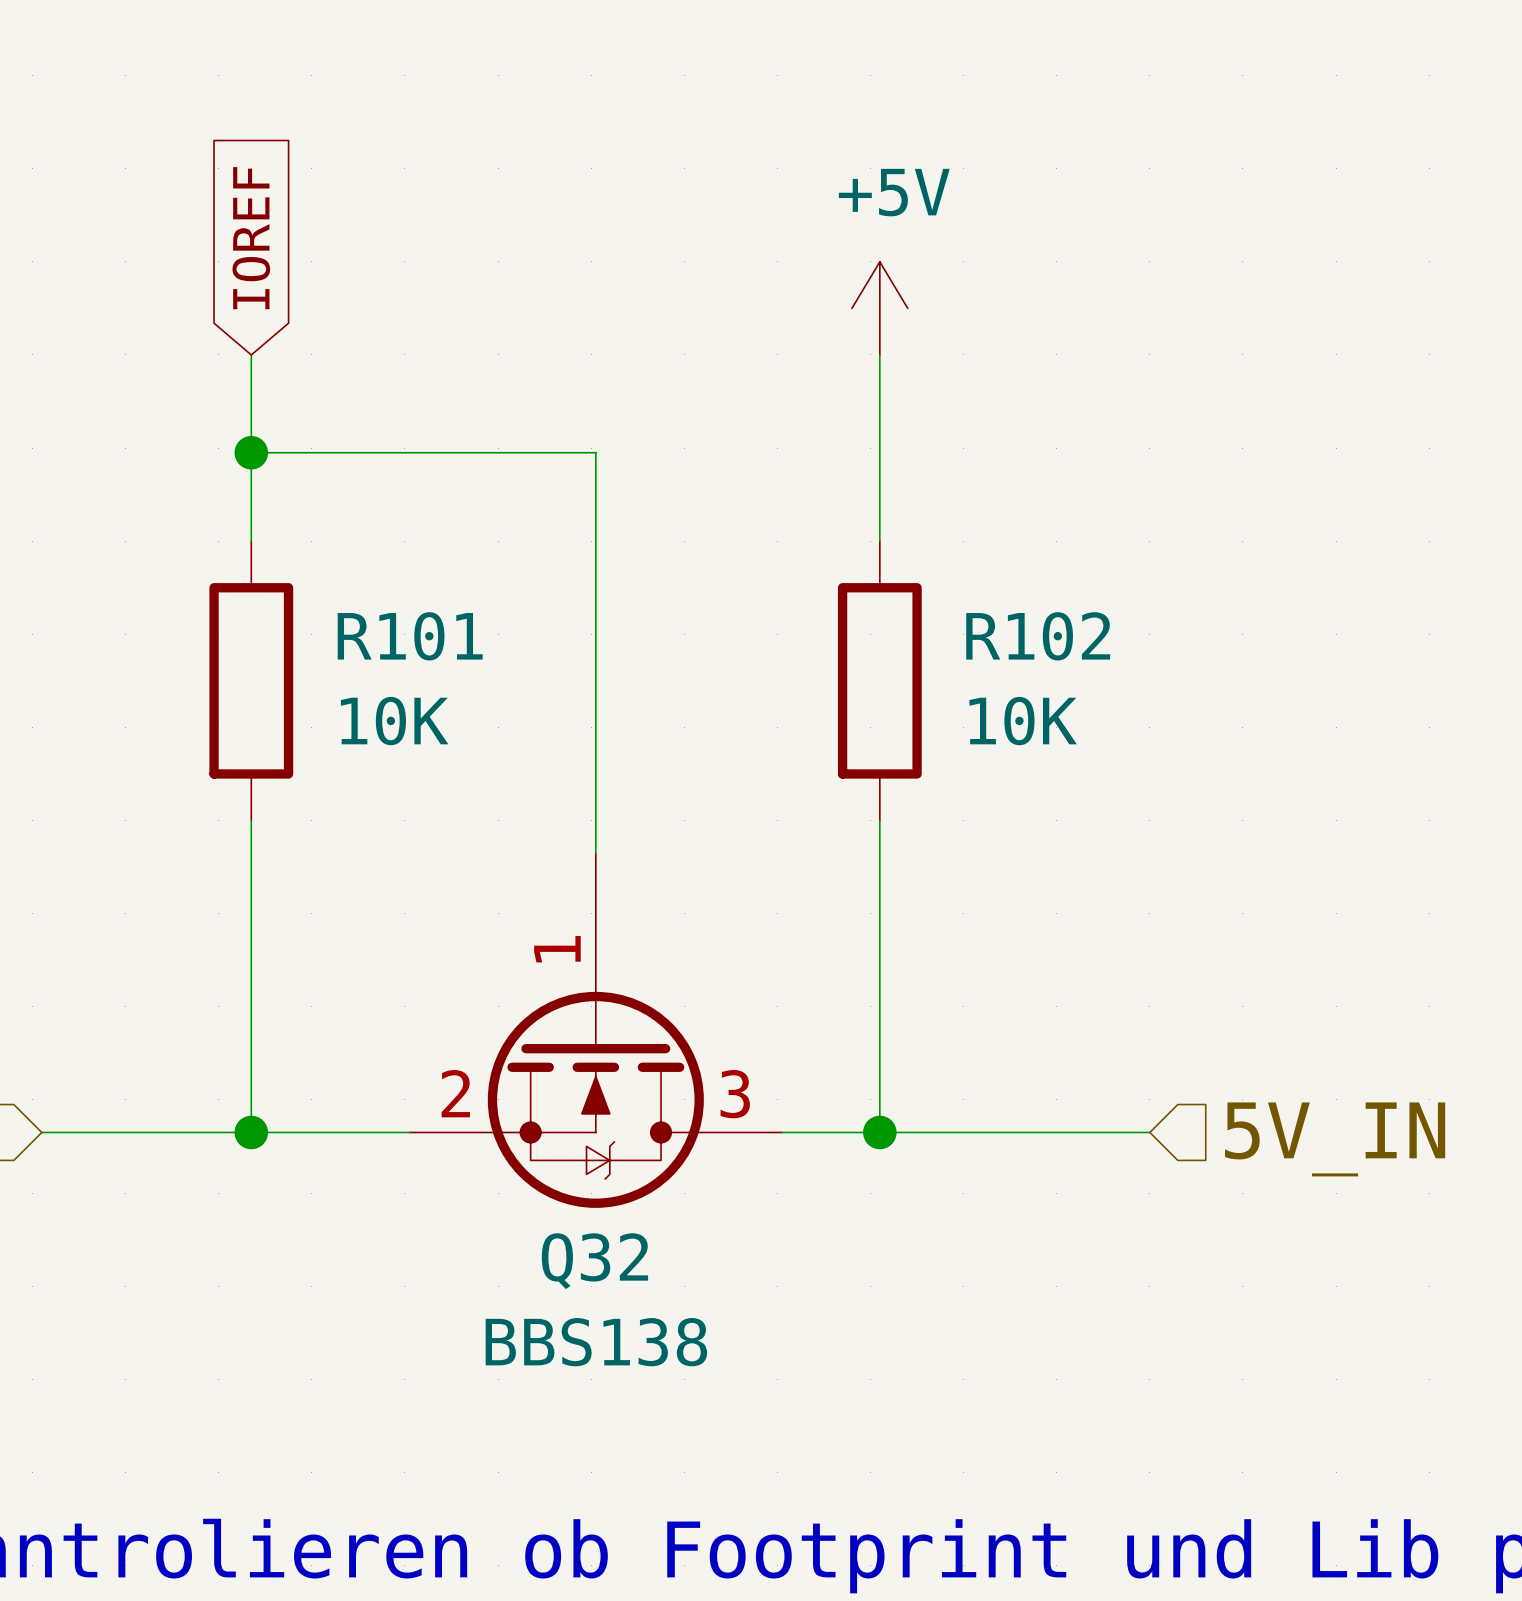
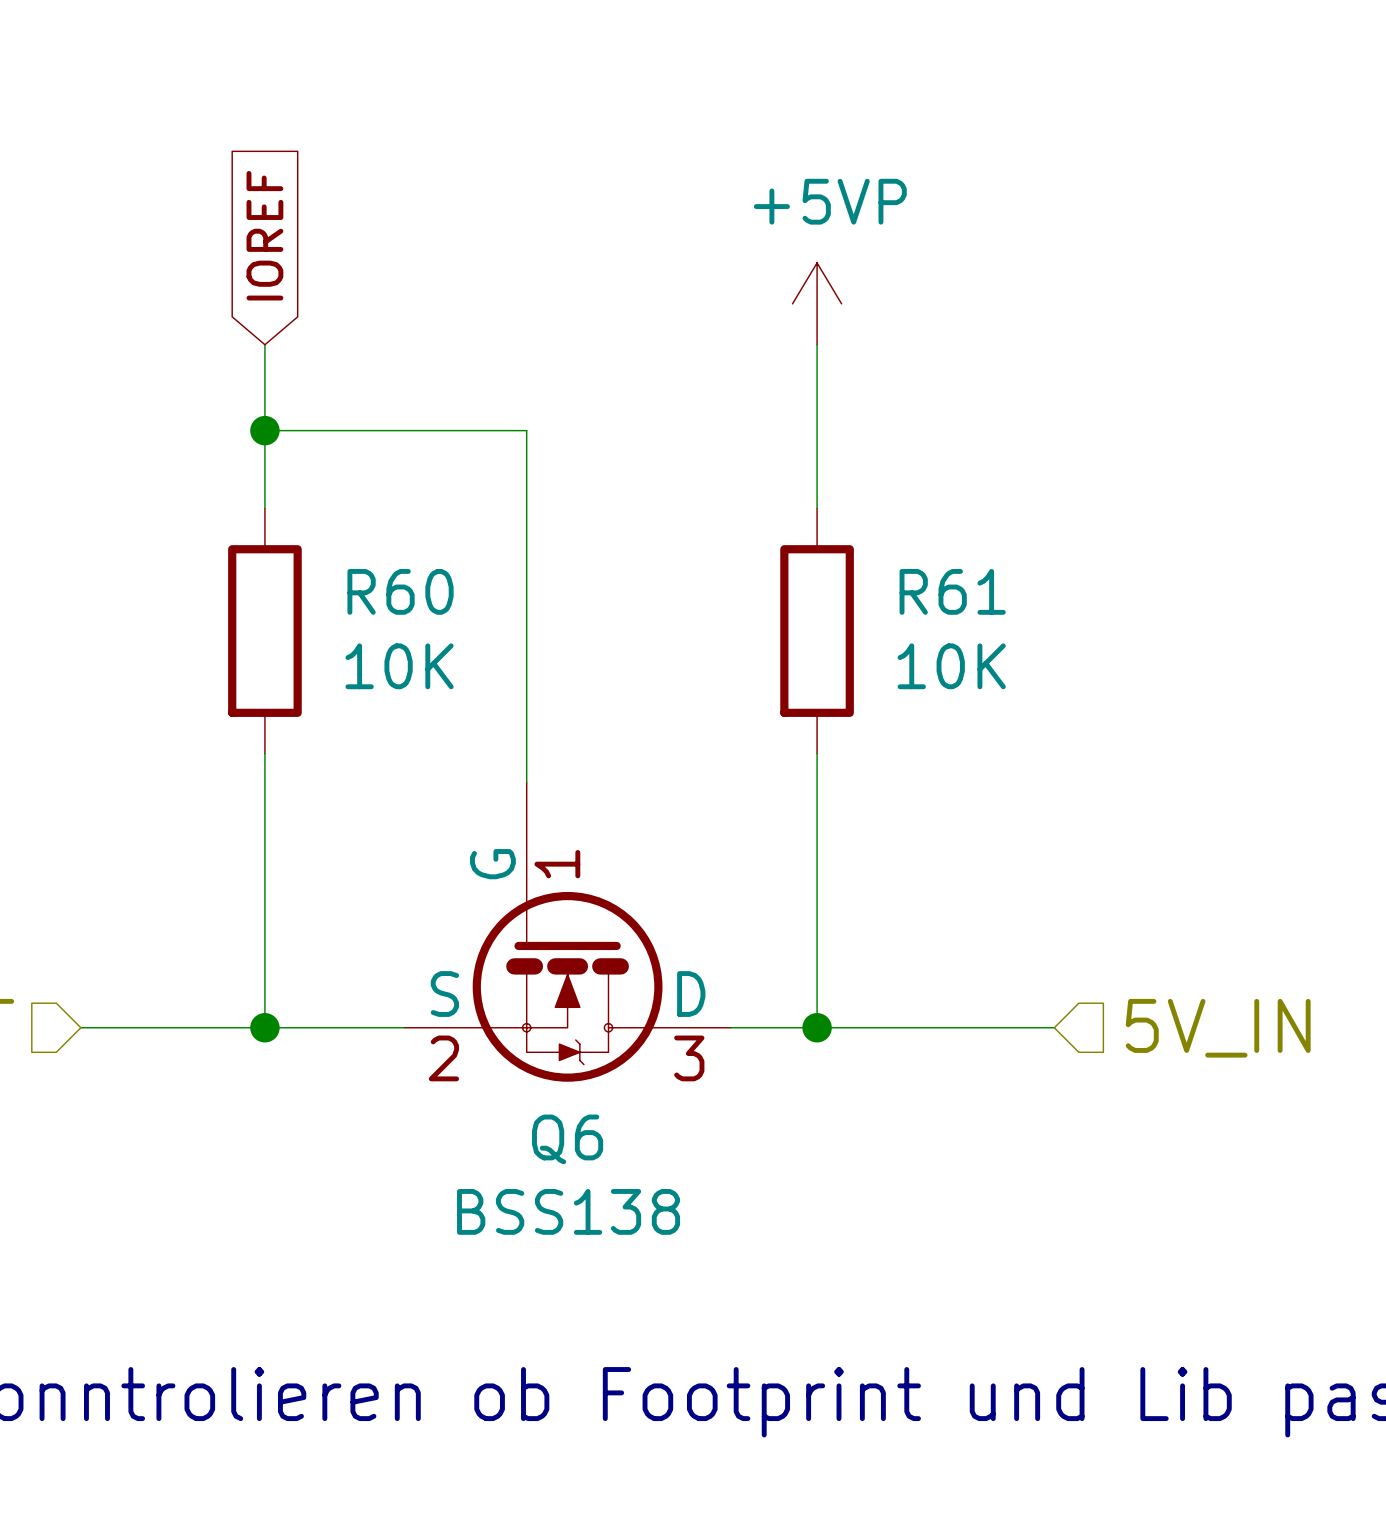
power symbol: +5V (879, 308) -> +5VP (817, 303)
wire: (549, 452) (595, 452) (595, 853) -> (526, 430) (526, 782)
R101 name: R101 (410, 636) -> R60 (400, 591)
R102 name: R102 (1038, 636) -> R61 (952, 591)
Q6: none -> BSS138 (567, 932)
Q32: BBS138 (595, 1030) -> none

